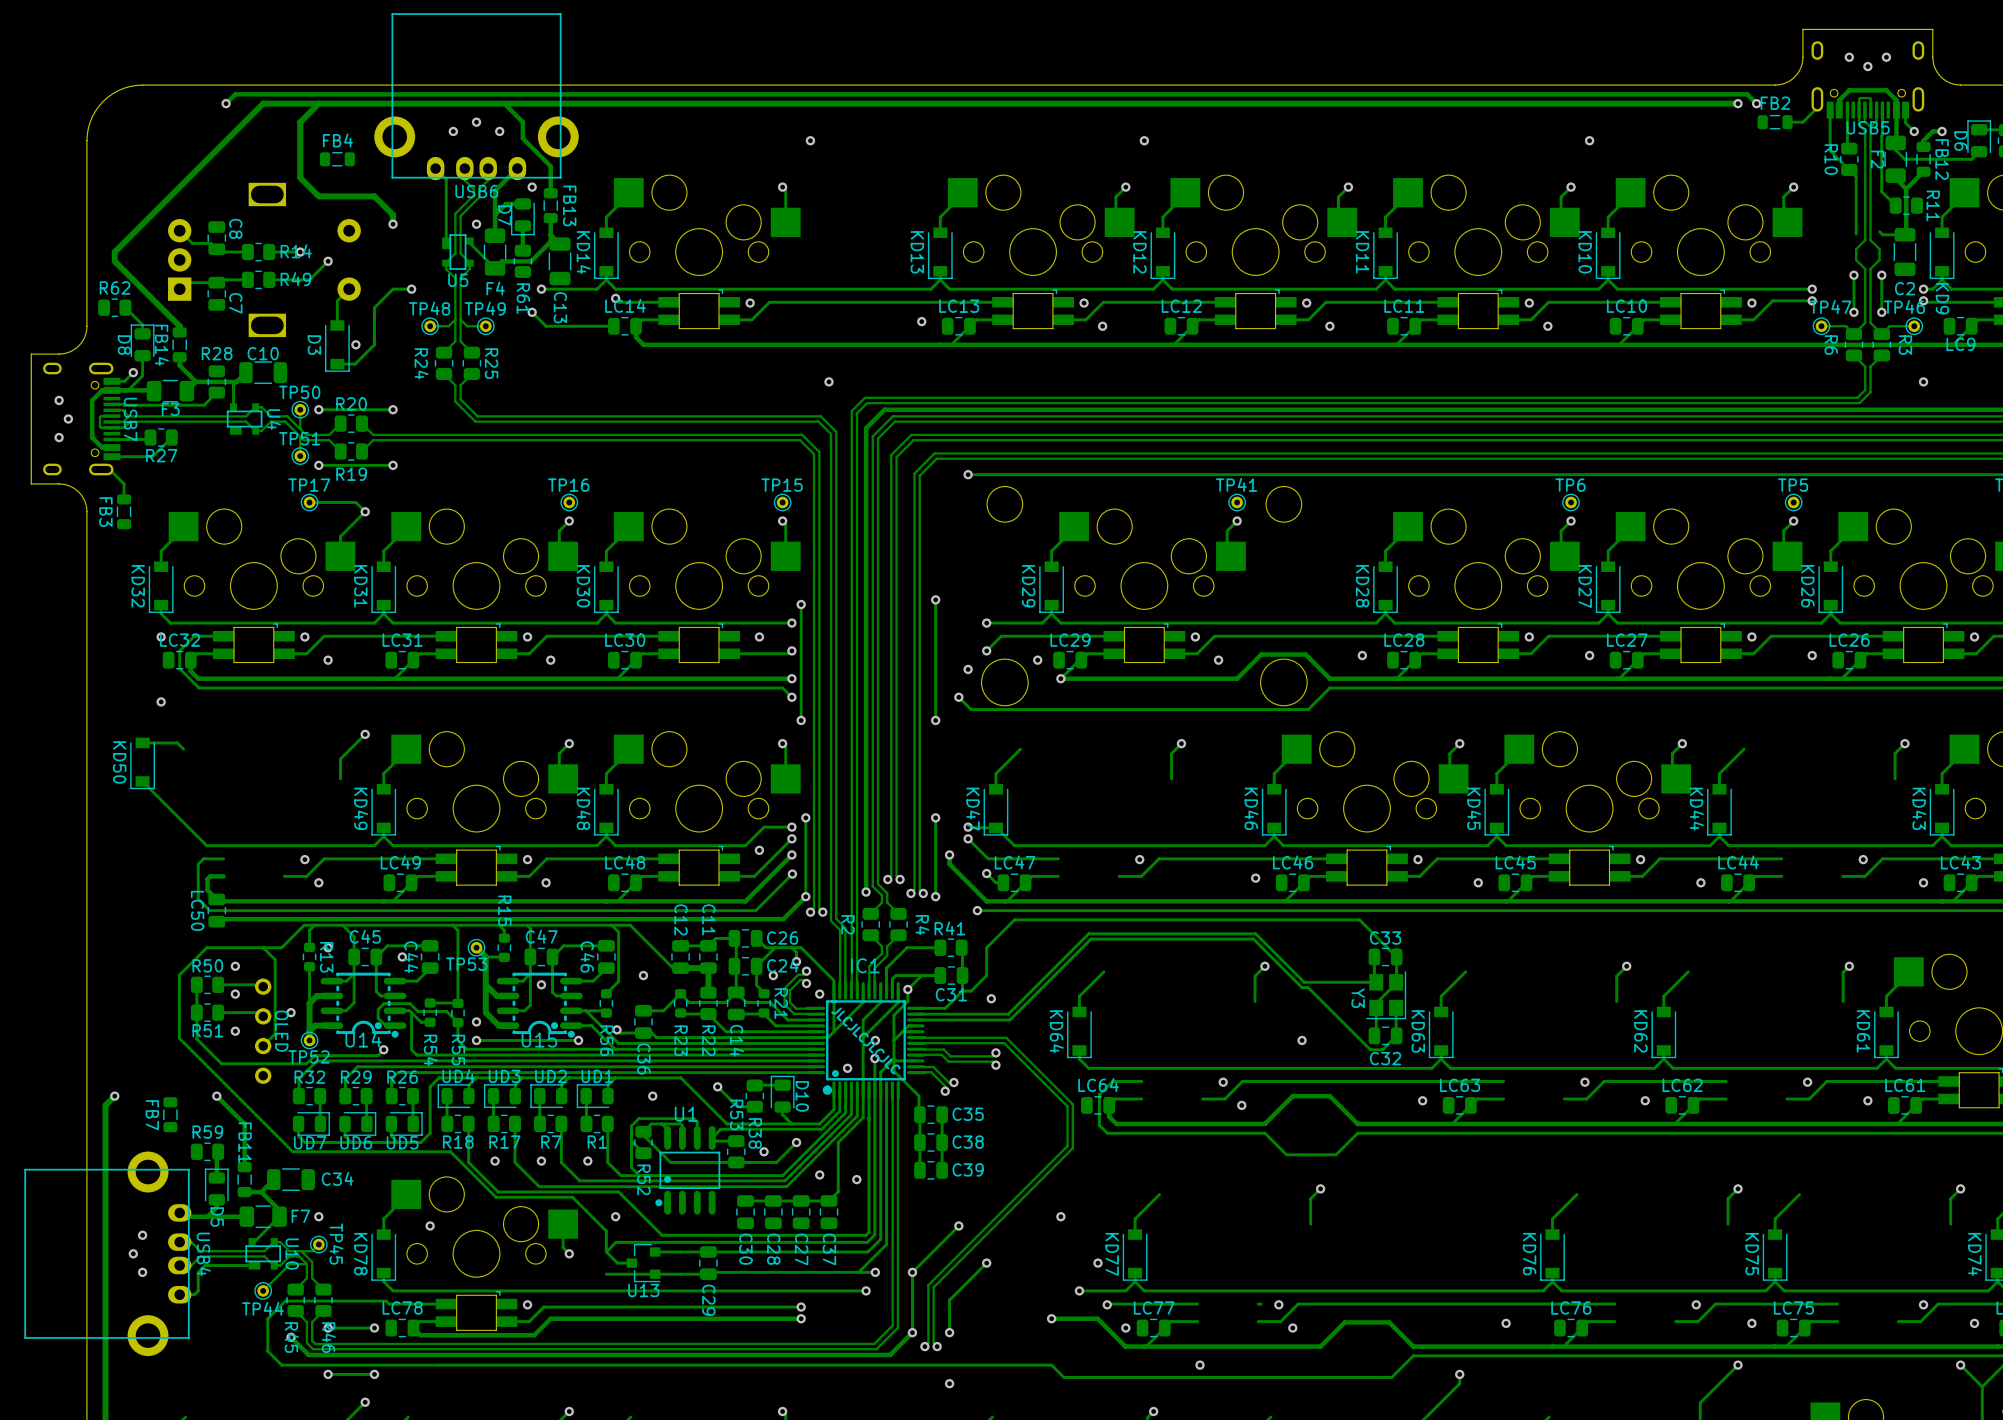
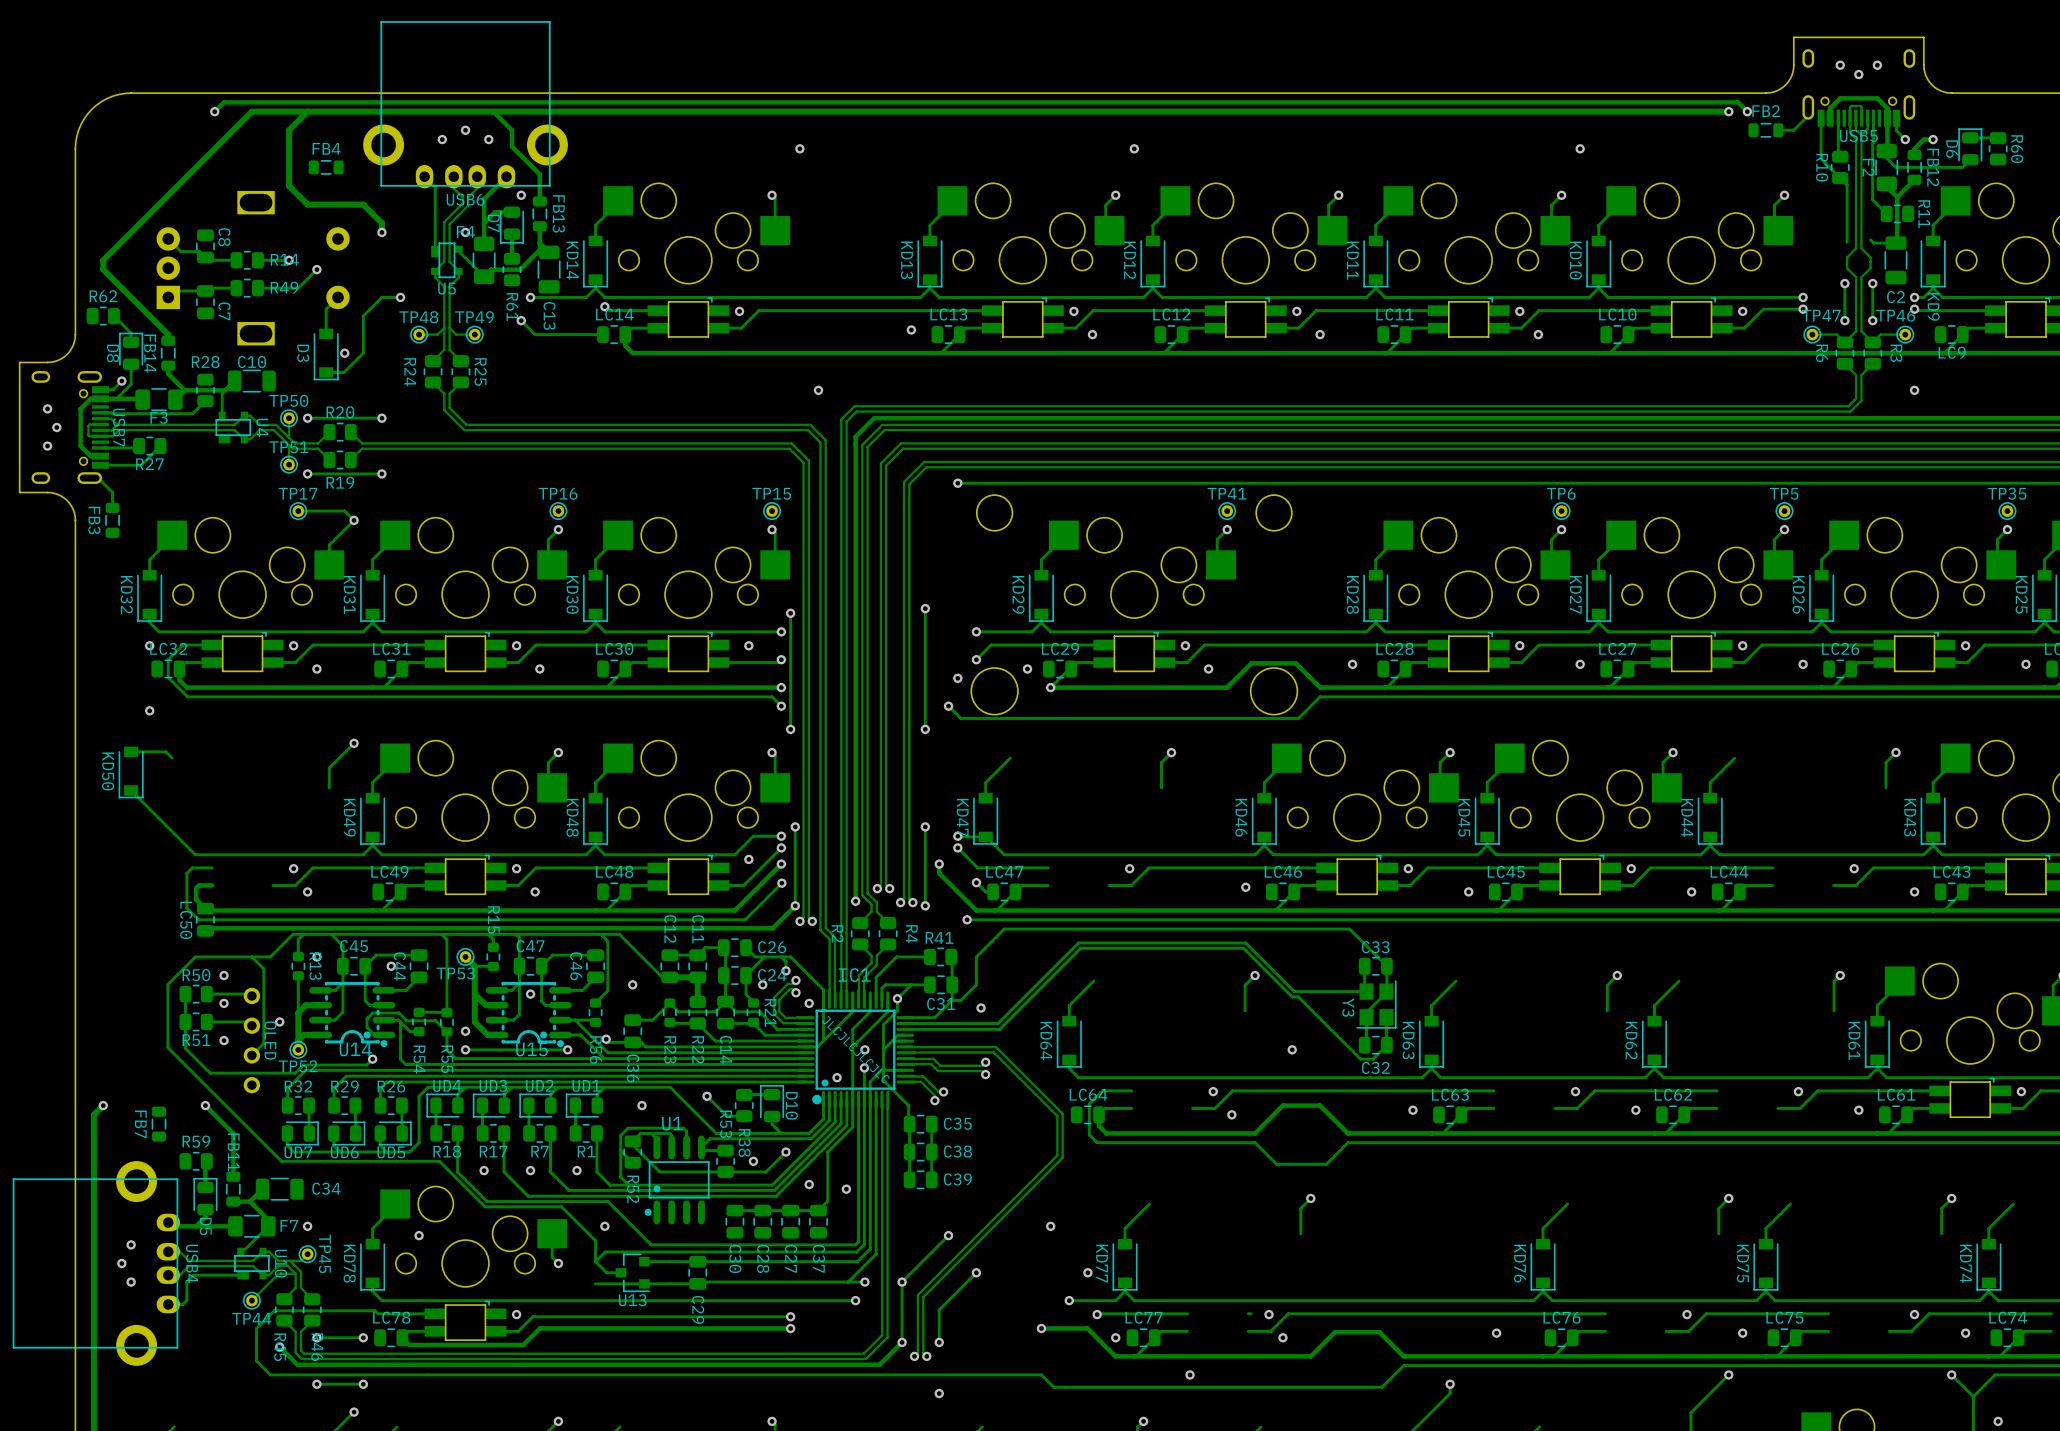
F4 name position: F4 (495, 288) -> F4 (465, 232)

